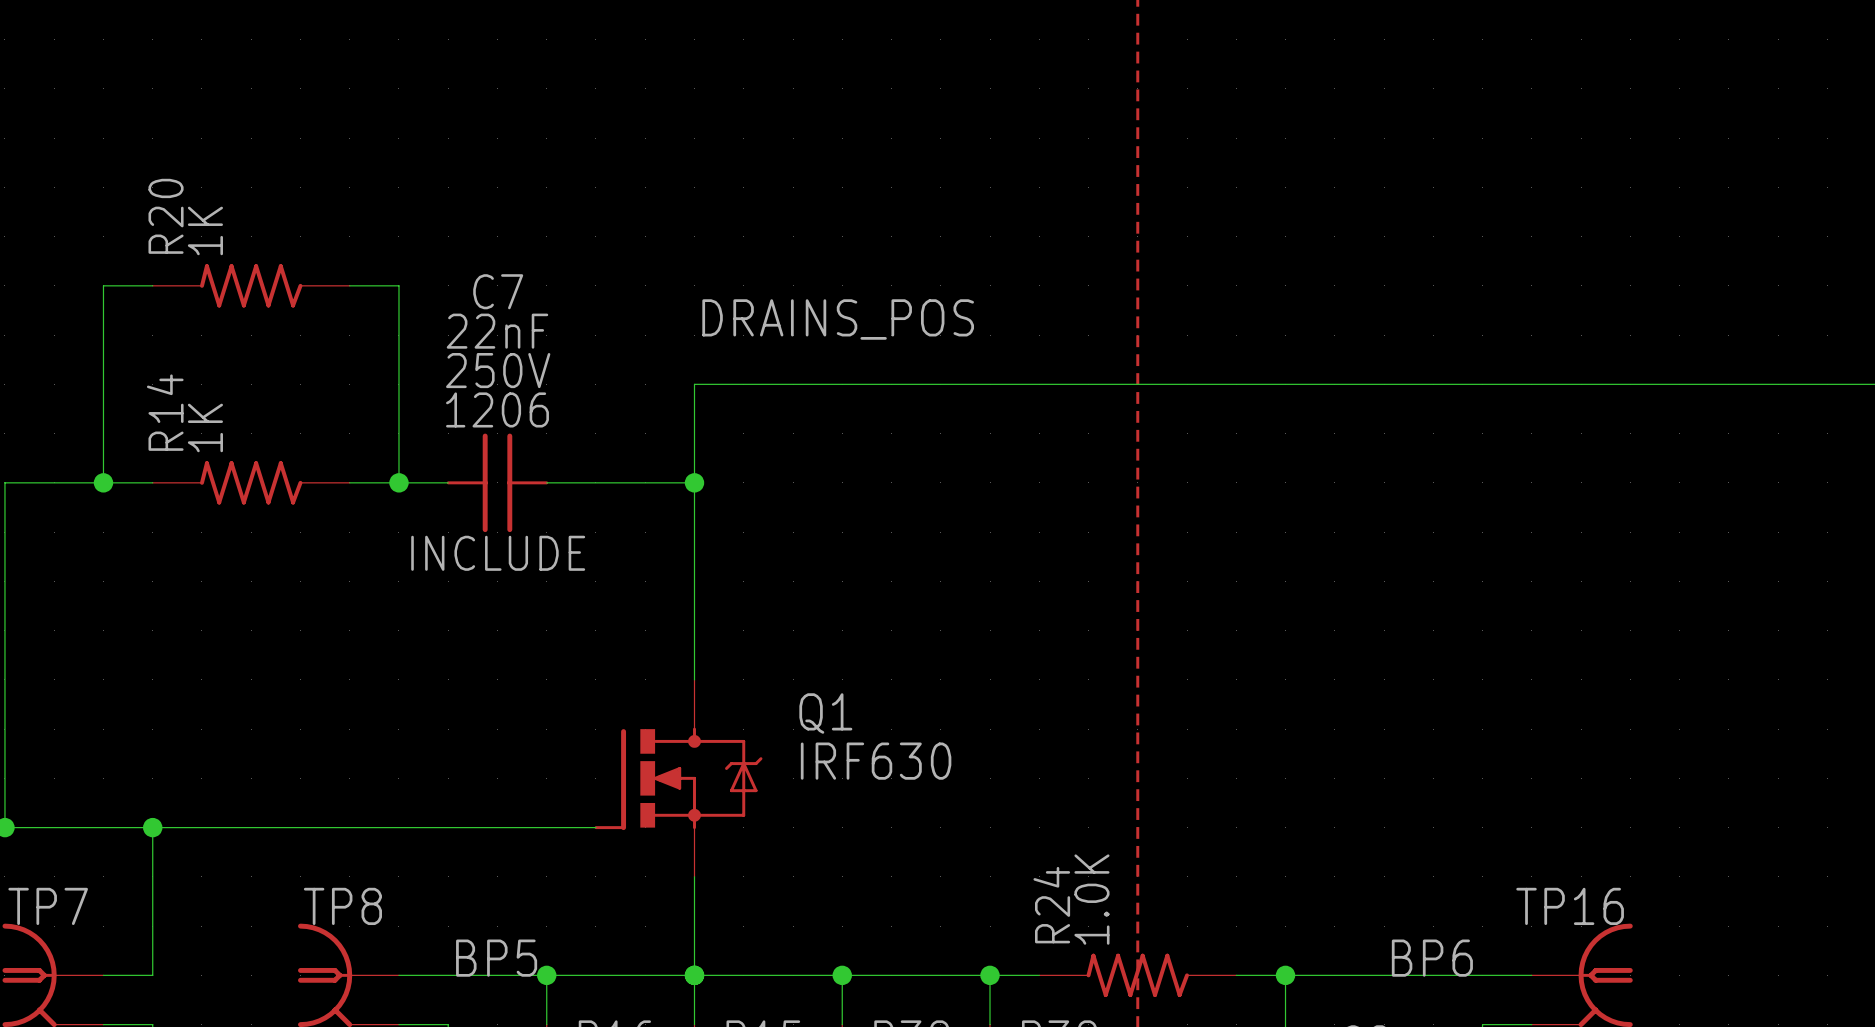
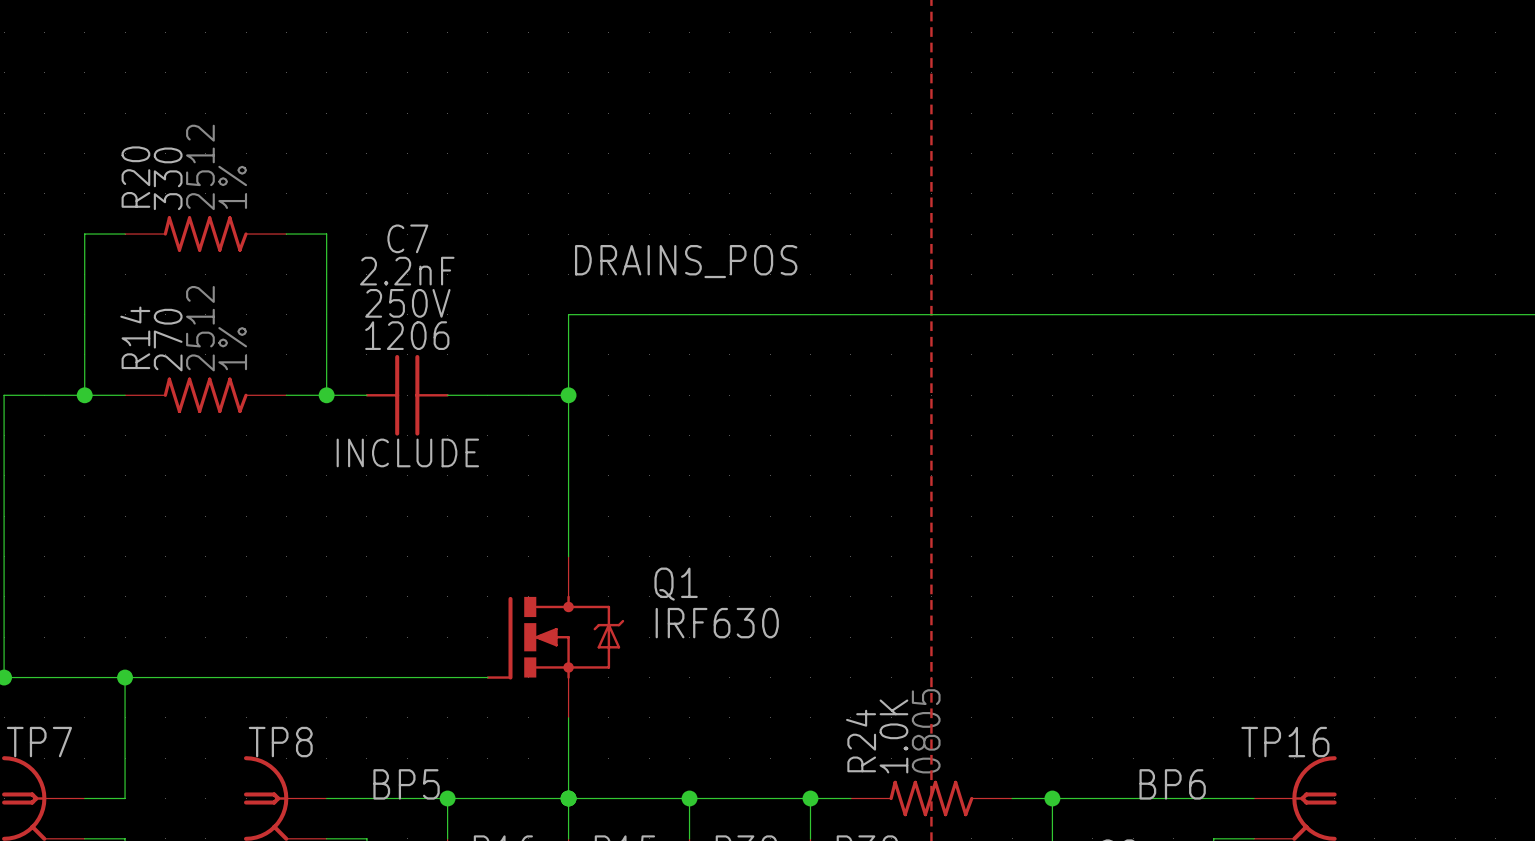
R20 text: none -> 2512 (200, 167)
R20 text: none -> 1% (232, 187)
R20 value: 1K (205, 230) -> 330 (168, 178)
C7 value: 22nF (497, 331) -> 2.2nF (407, 271)
R14 text: none -> 2512 (200, 328)
R14 text: none -> 1% (232, 348)
R14 value: 1K (205, 427) -> 270 (168, 340)
R24 text: none -> 0805 (926, 731)

